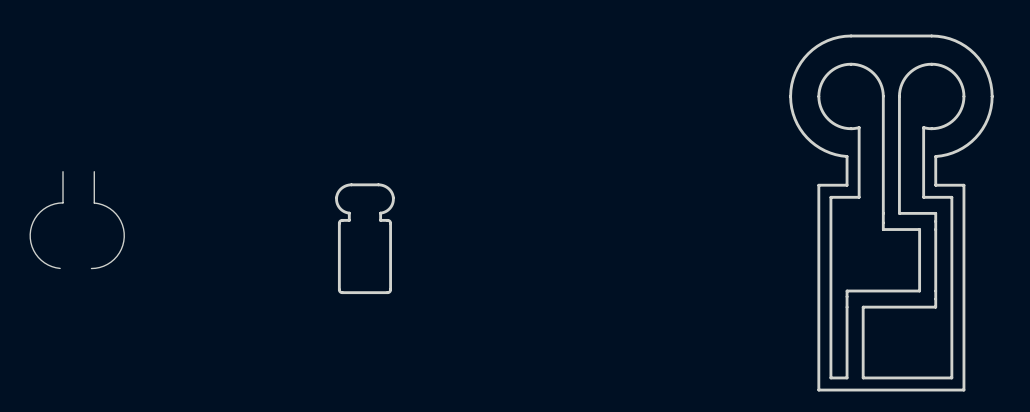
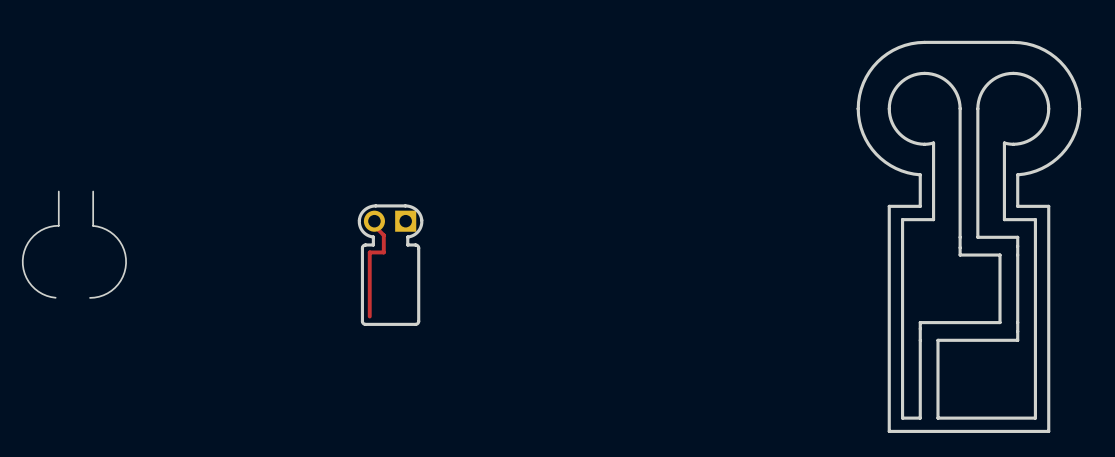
top track: none -> (374, 221) (374, 225) (383, 235) (383, 252) (369, 252) (369, 316)
part: none -> (390, 221)

